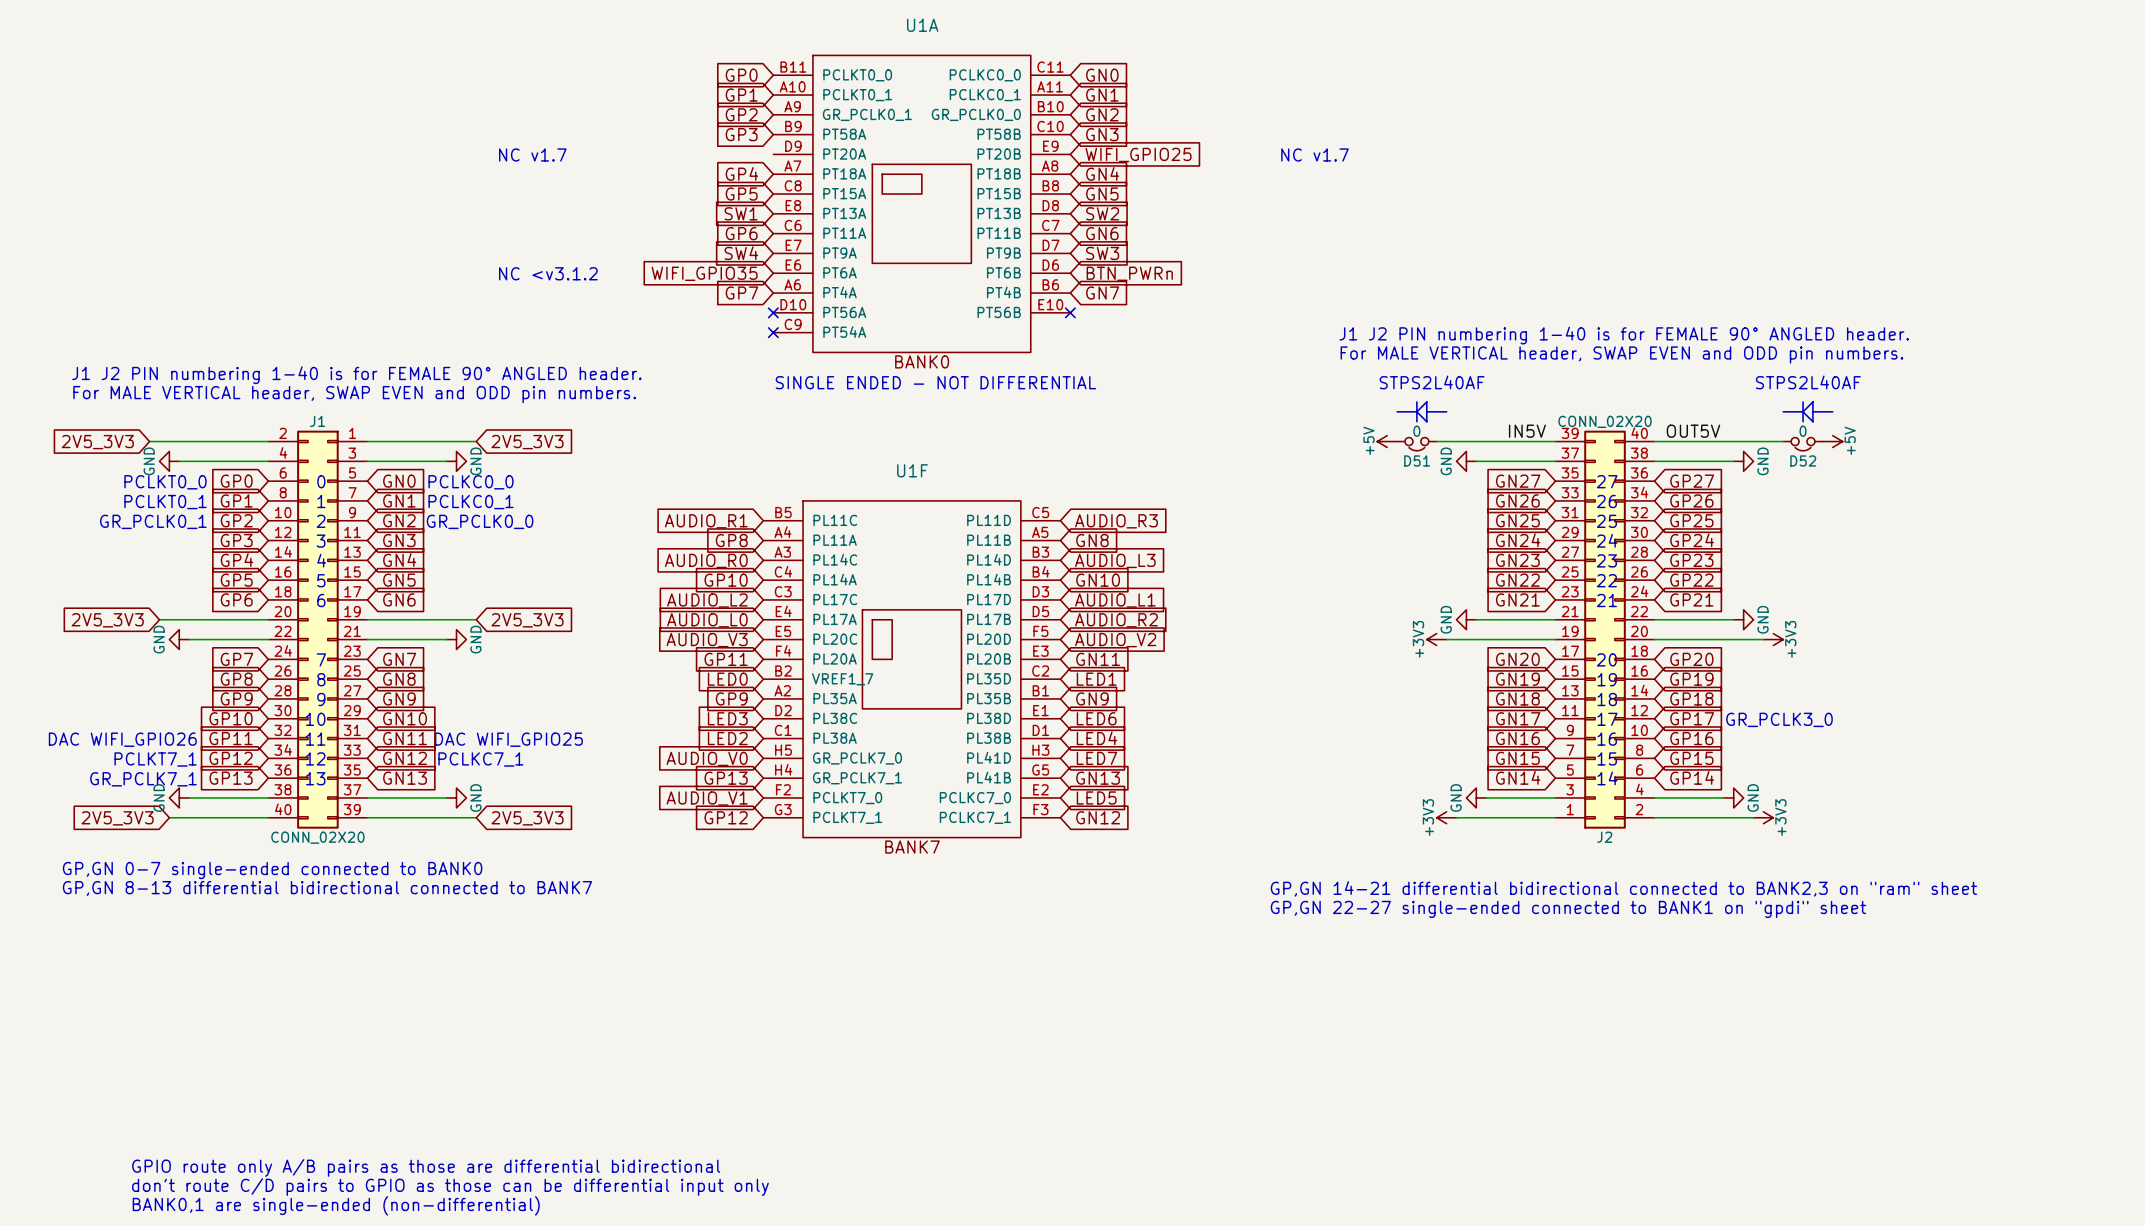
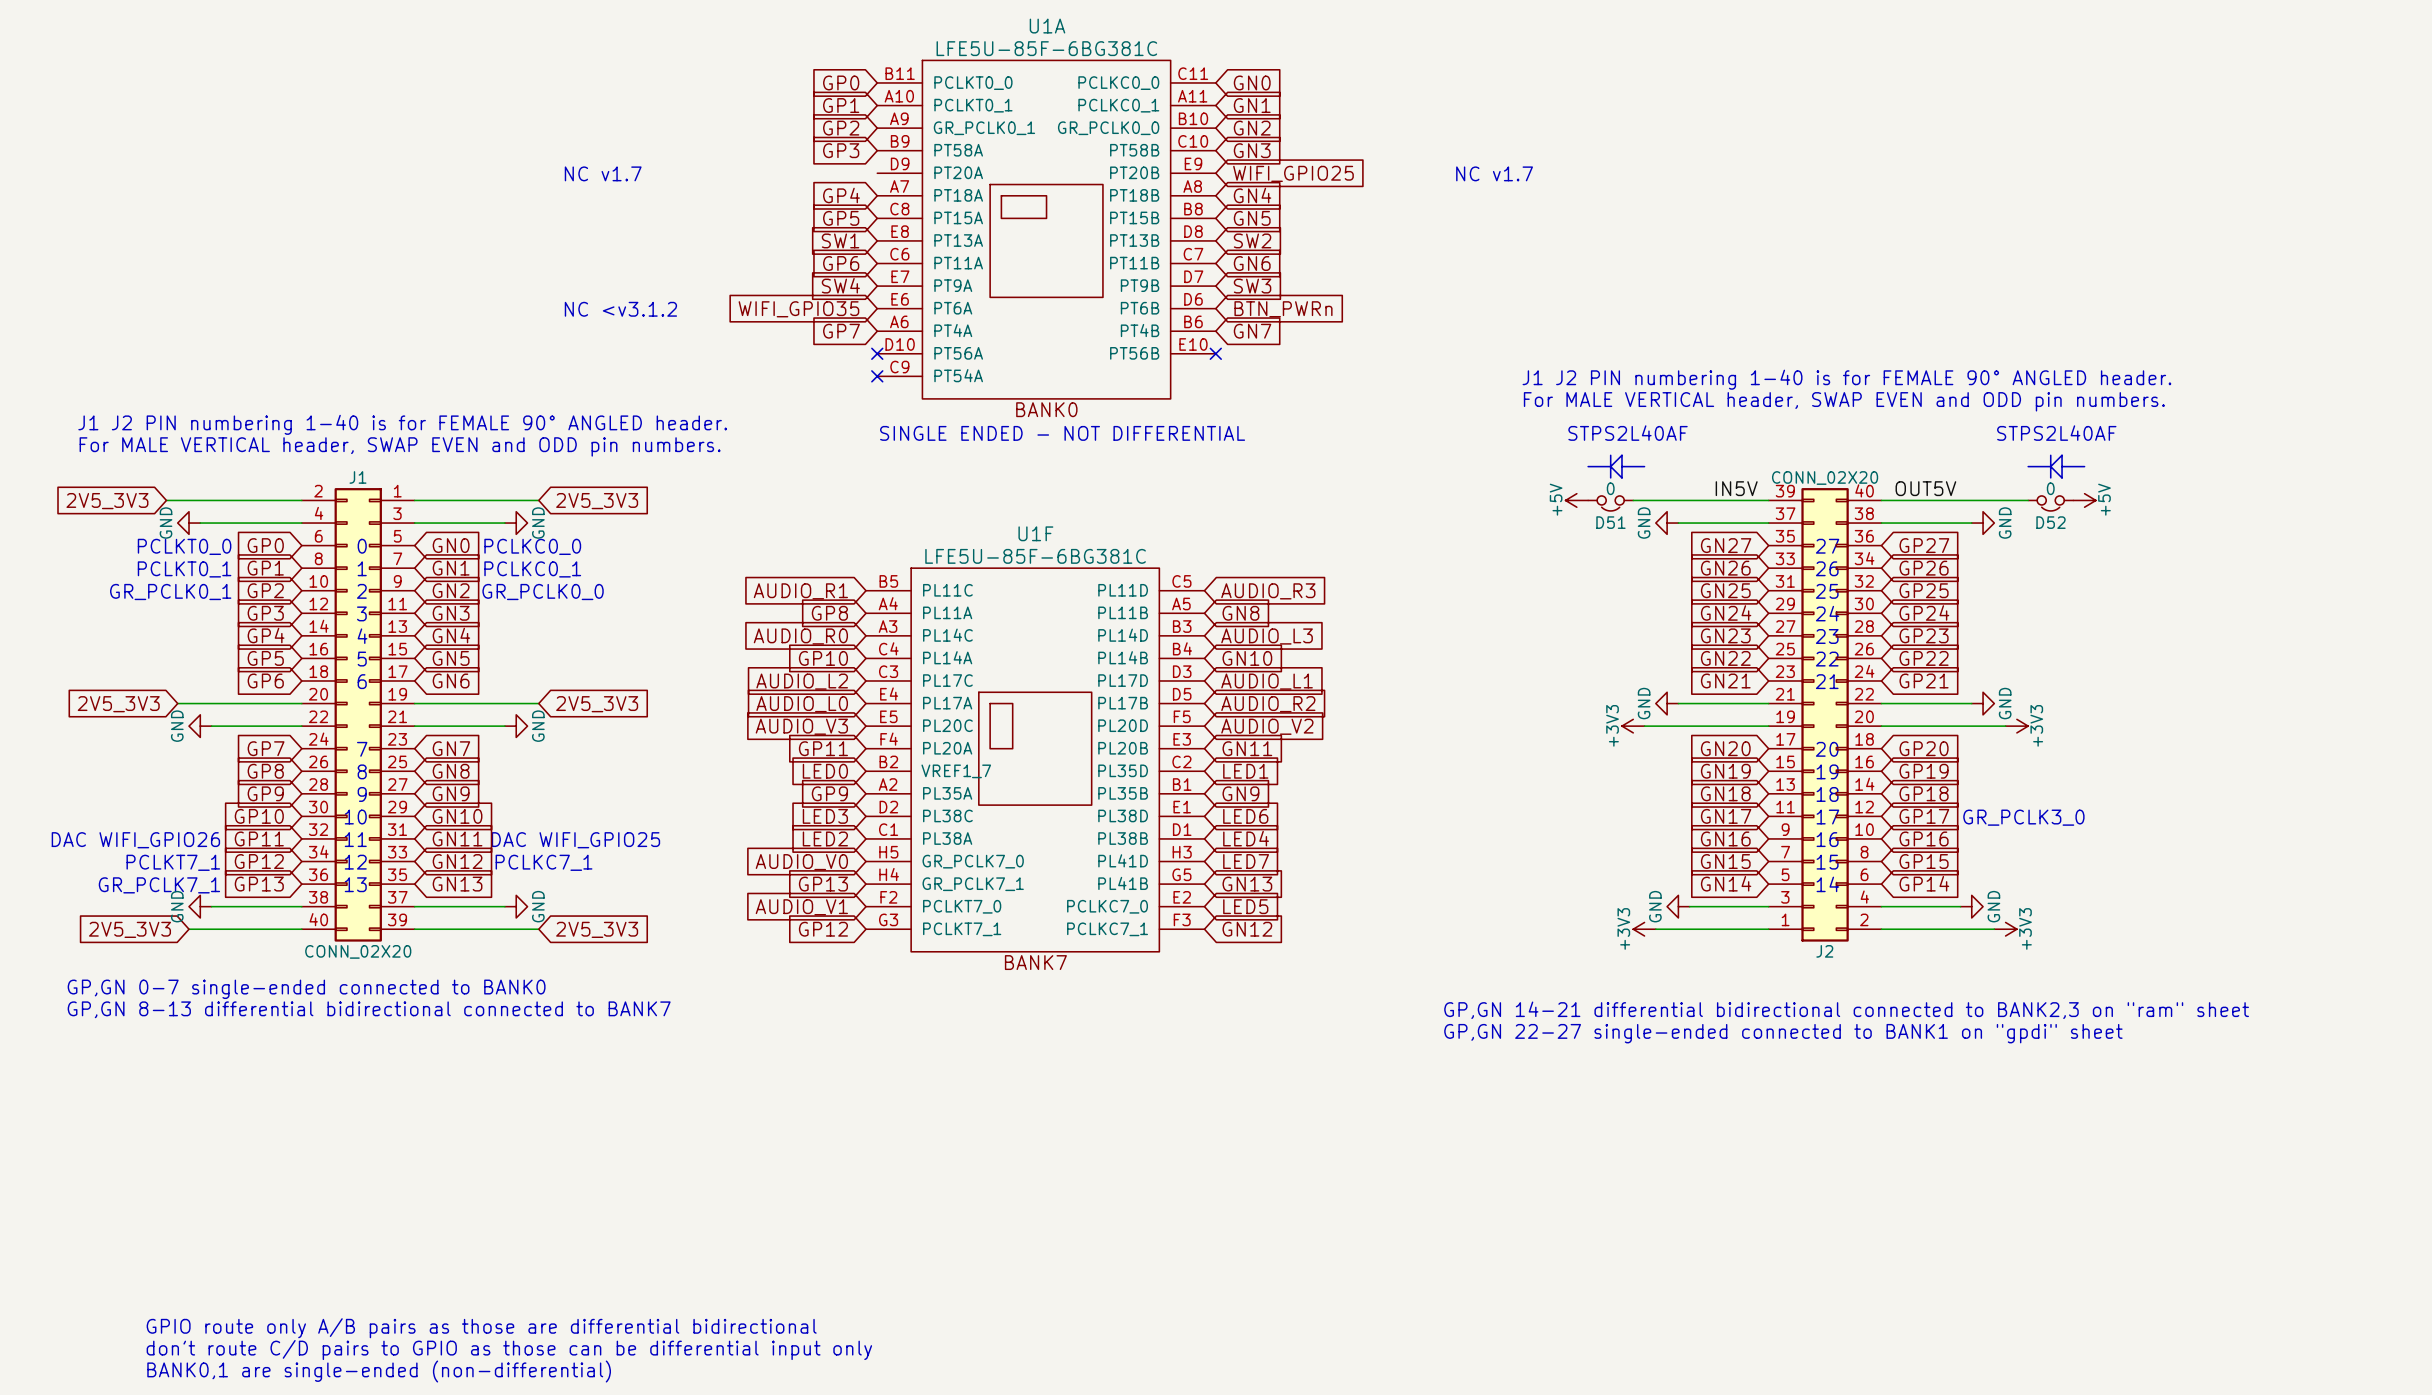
U1A value: none -> LFE5U-85F-6BG381C (1046, 48)
U1F value: none -> LFE5U-85F-6BG381C (1035, 556)

